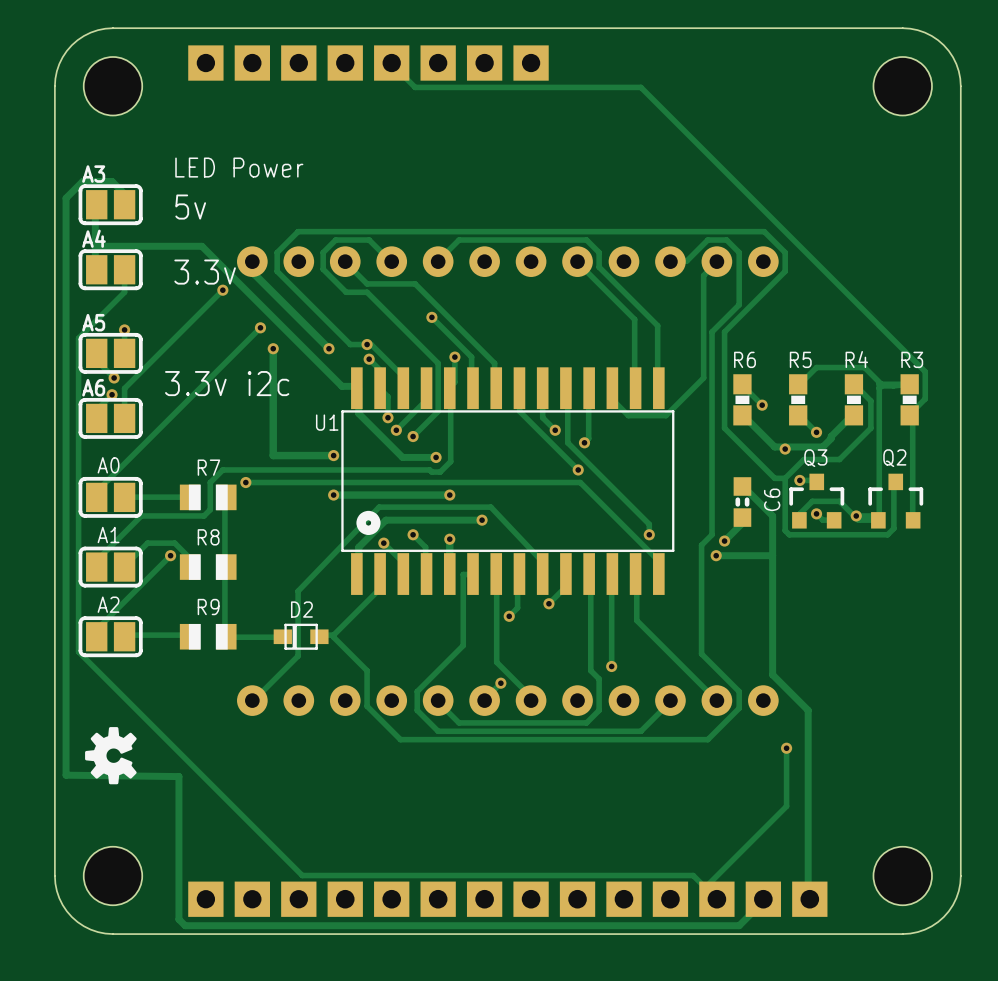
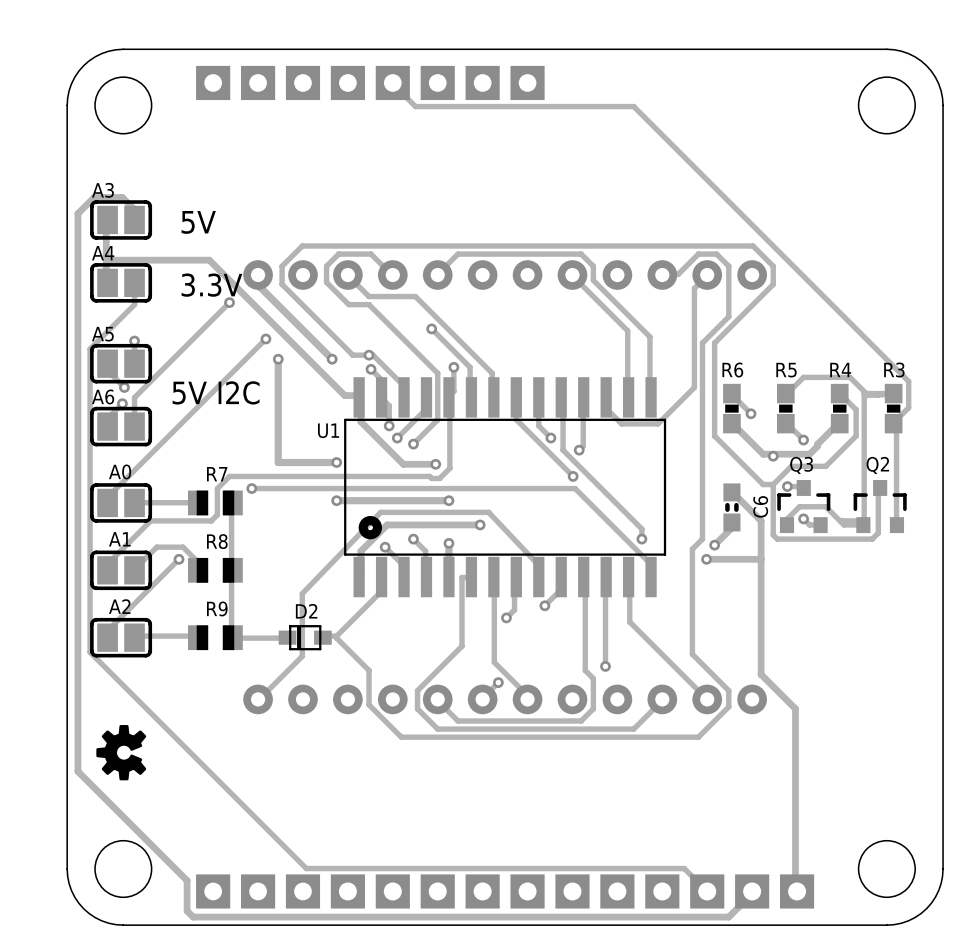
text: LED Power (239, 167) -> none
text: 5v (190, 207) -> 5V (198, 222)
text: 3.3v (205, 272) -> 3.3V (211, 285)
text: 3.3v i2c (227, 383) -> 5V I2C (216, 392)
via: (856, 515) -> none
track: (786, 748) (786, 806) (705, 887) -> none
via: (786, 748) -> none
track: (66, 775) (178, 776) (178, 888) -> (77, 771) (187, 880)

